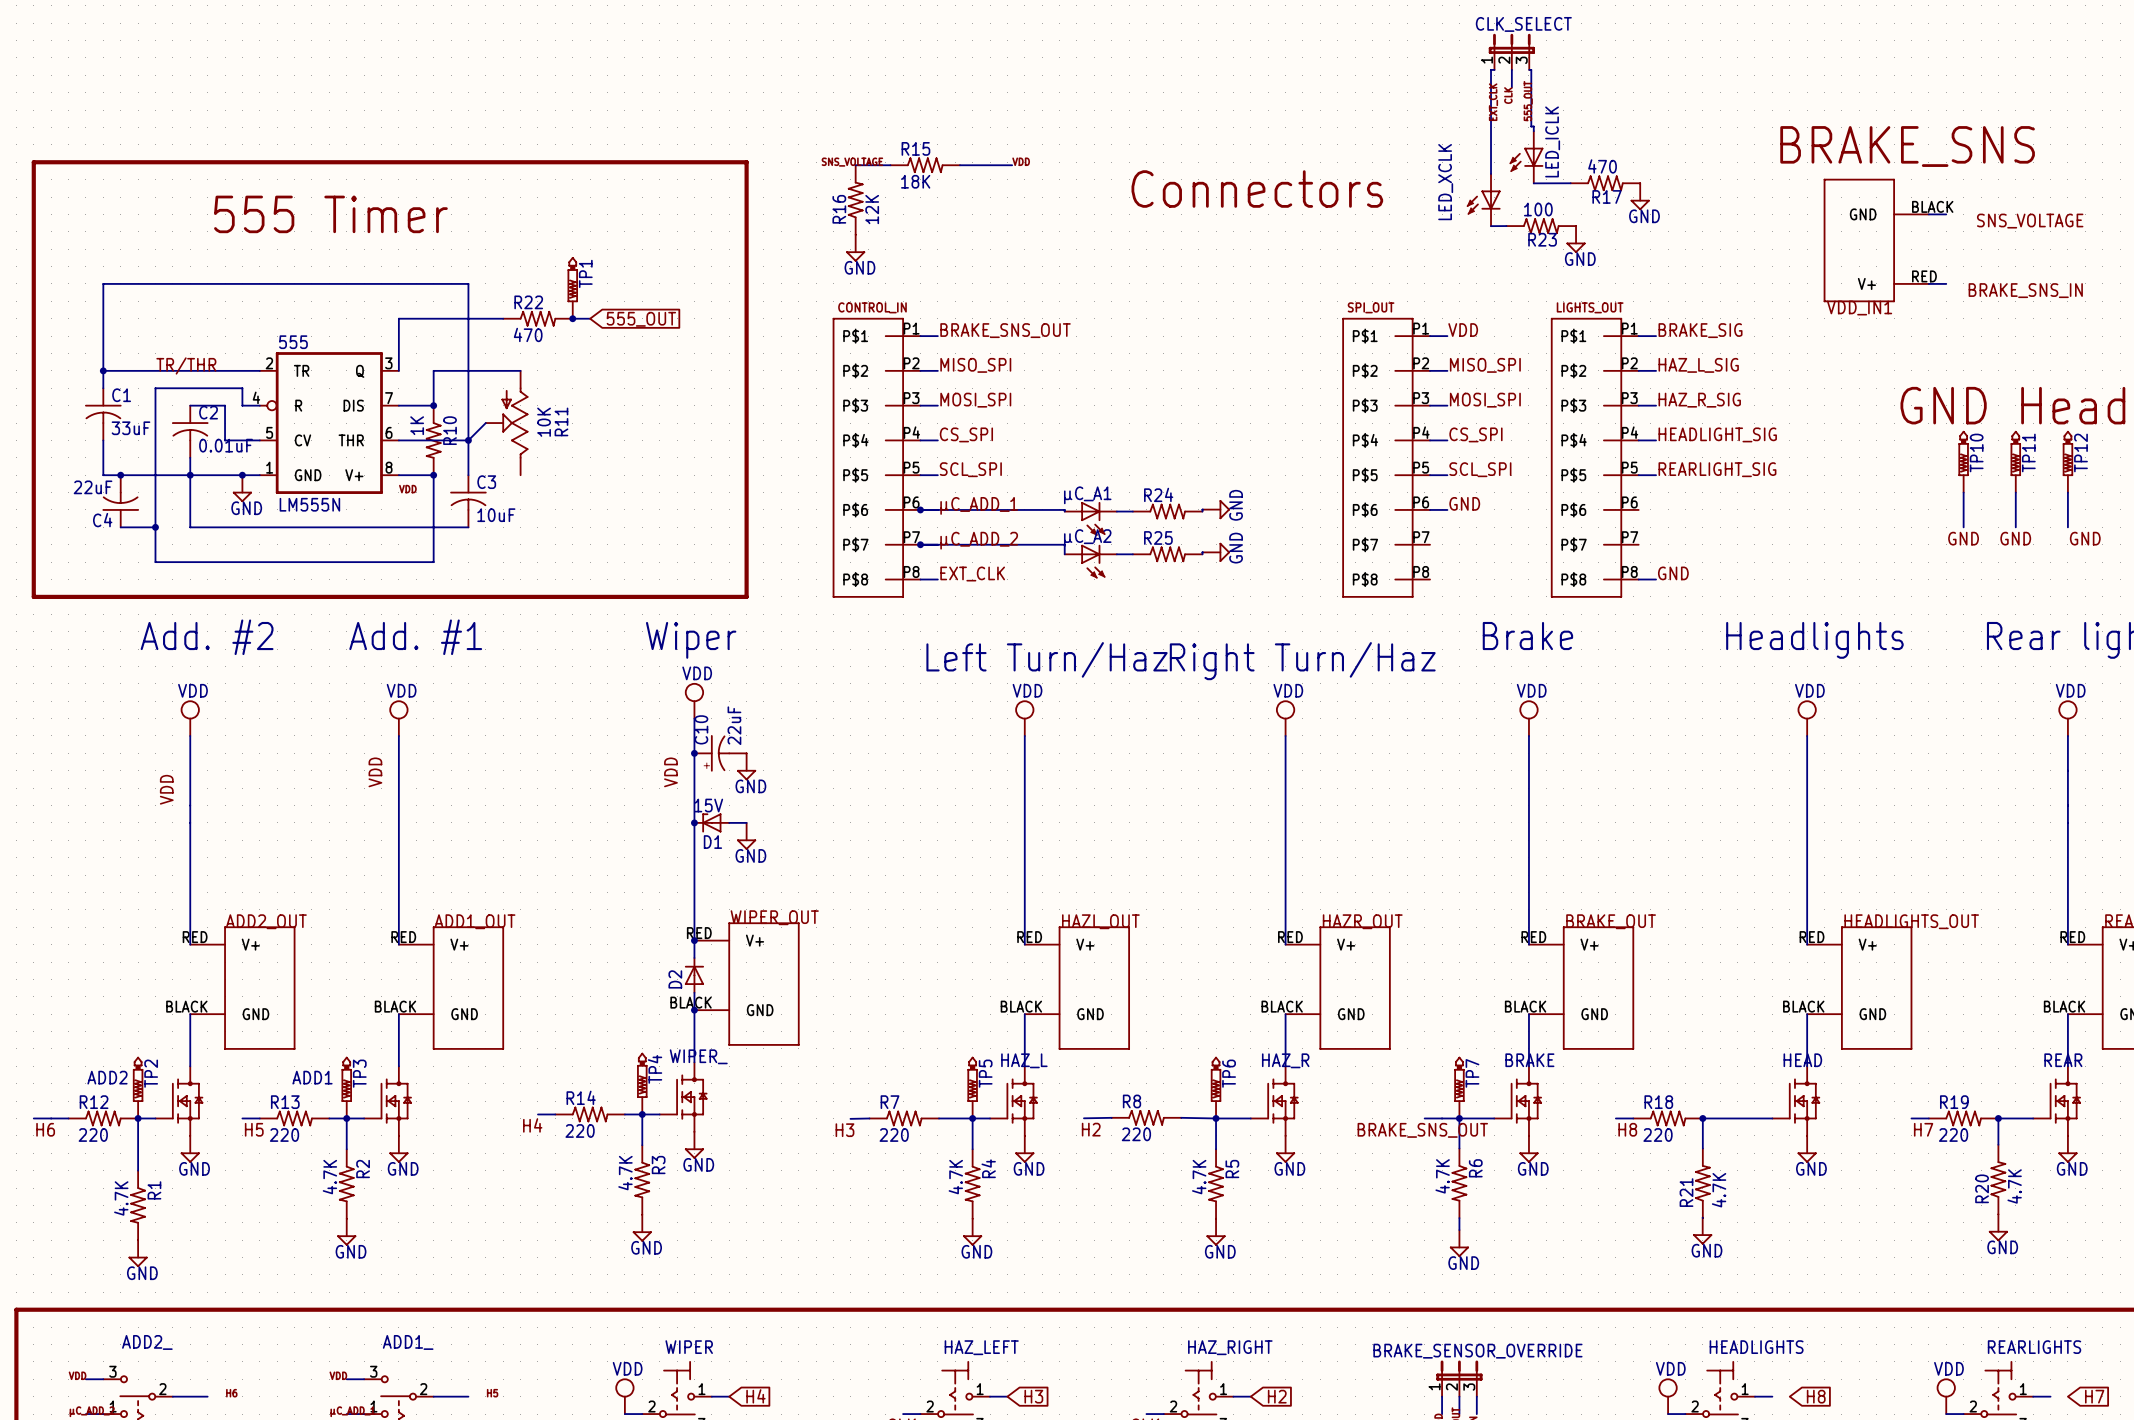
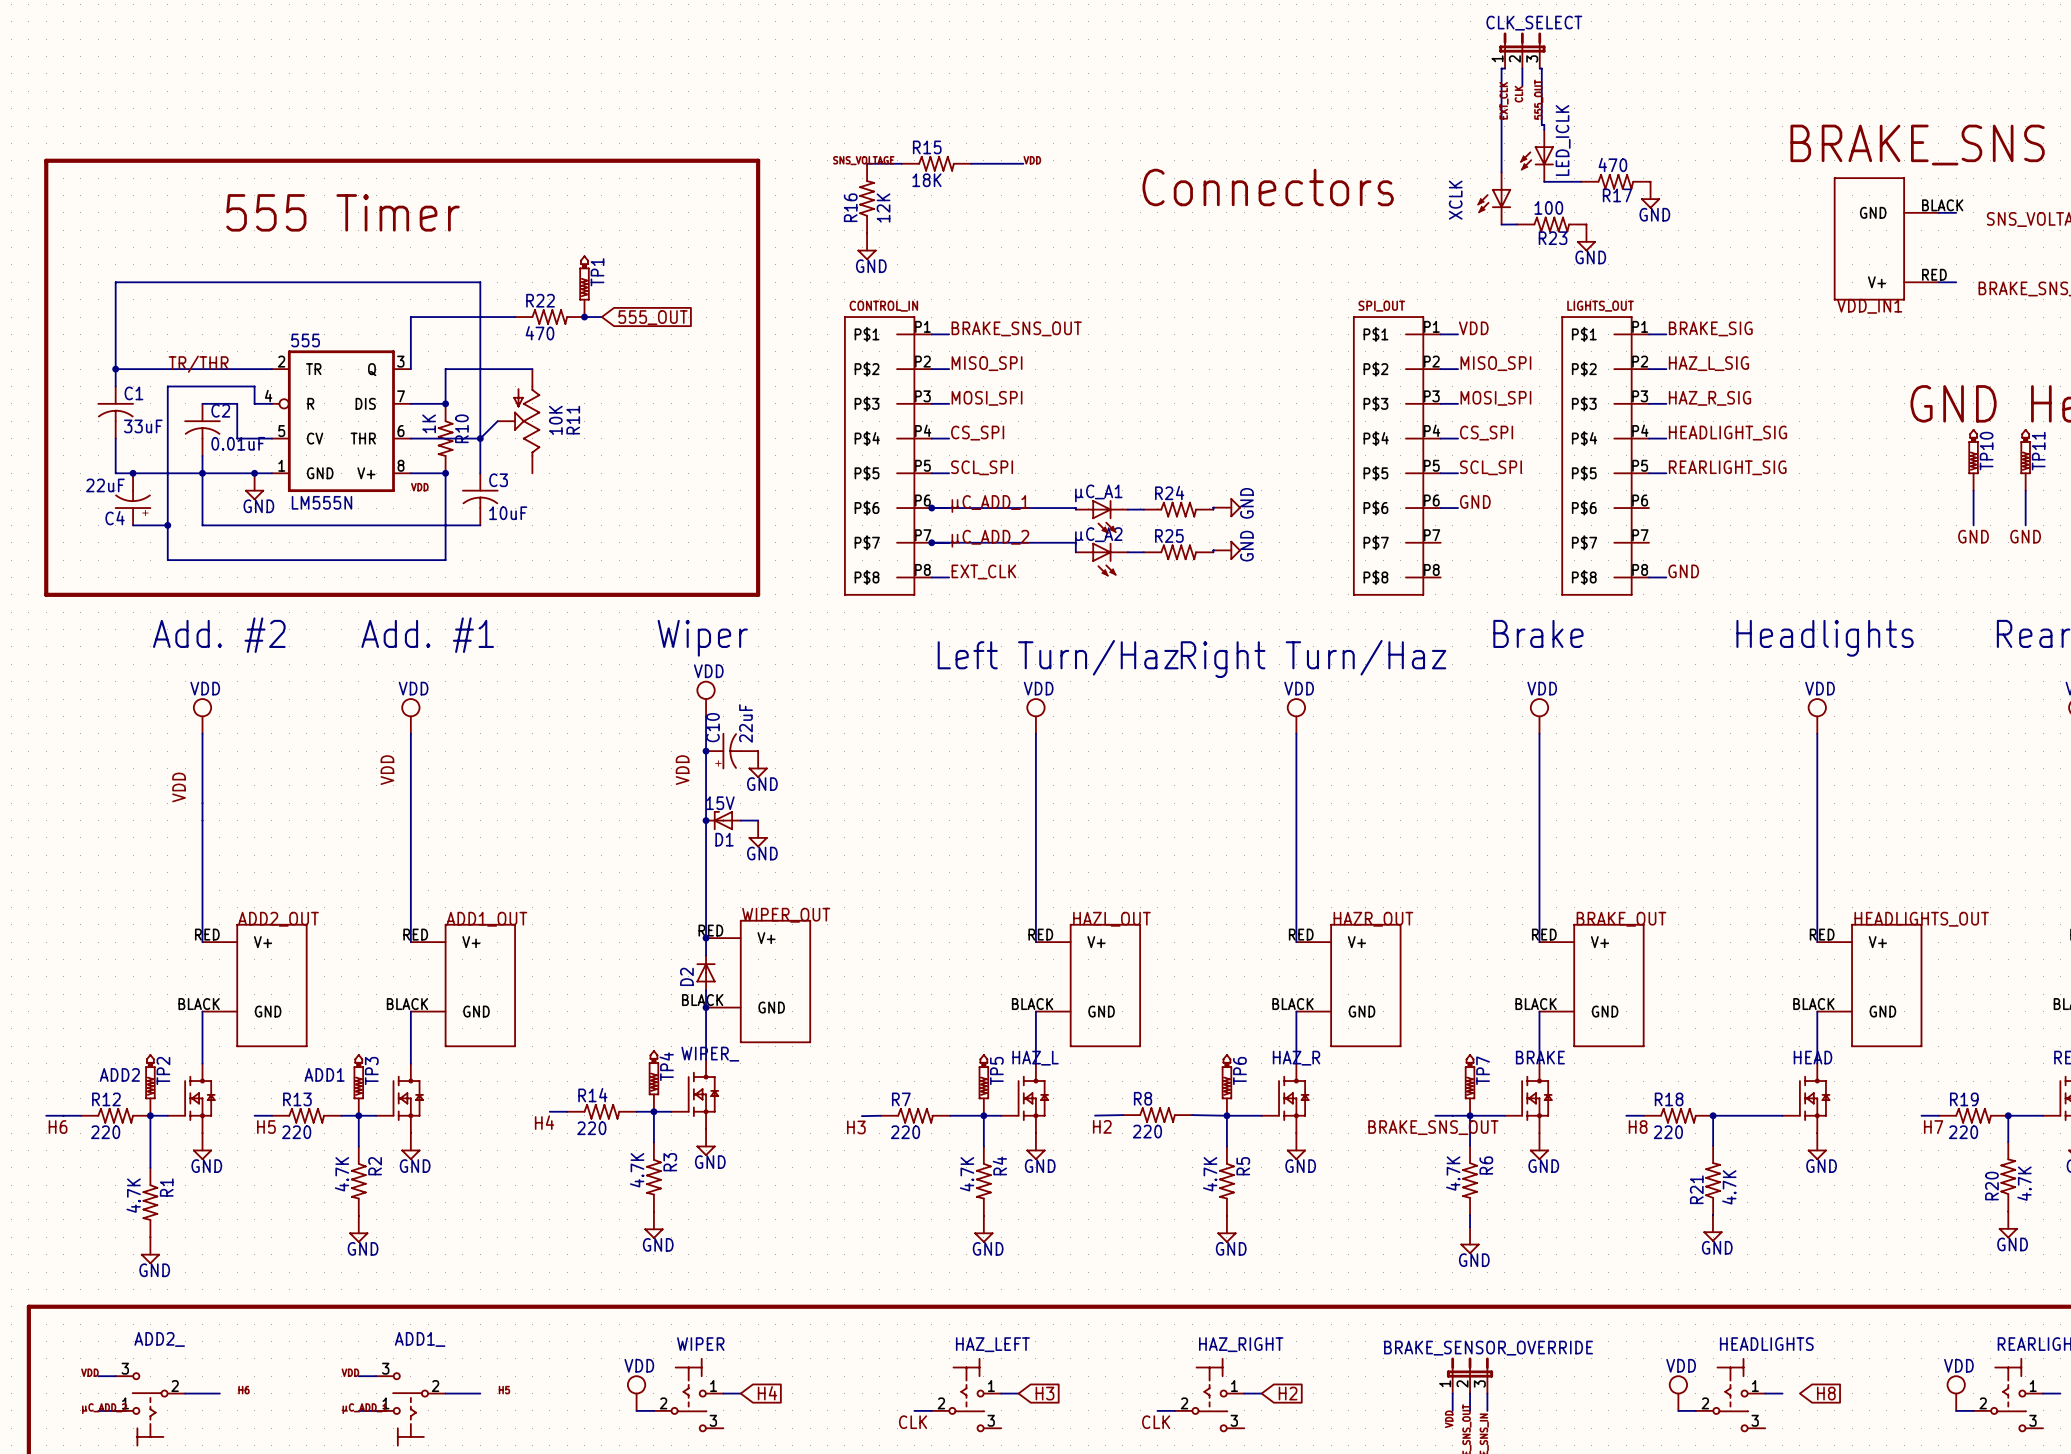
LED_XCLK name: LED_XCLK (1445, 182) -> XCLK (1455, 200)
C4 symbol: [102, 475, 139, 528] -> [114, 473, 152, 526]

